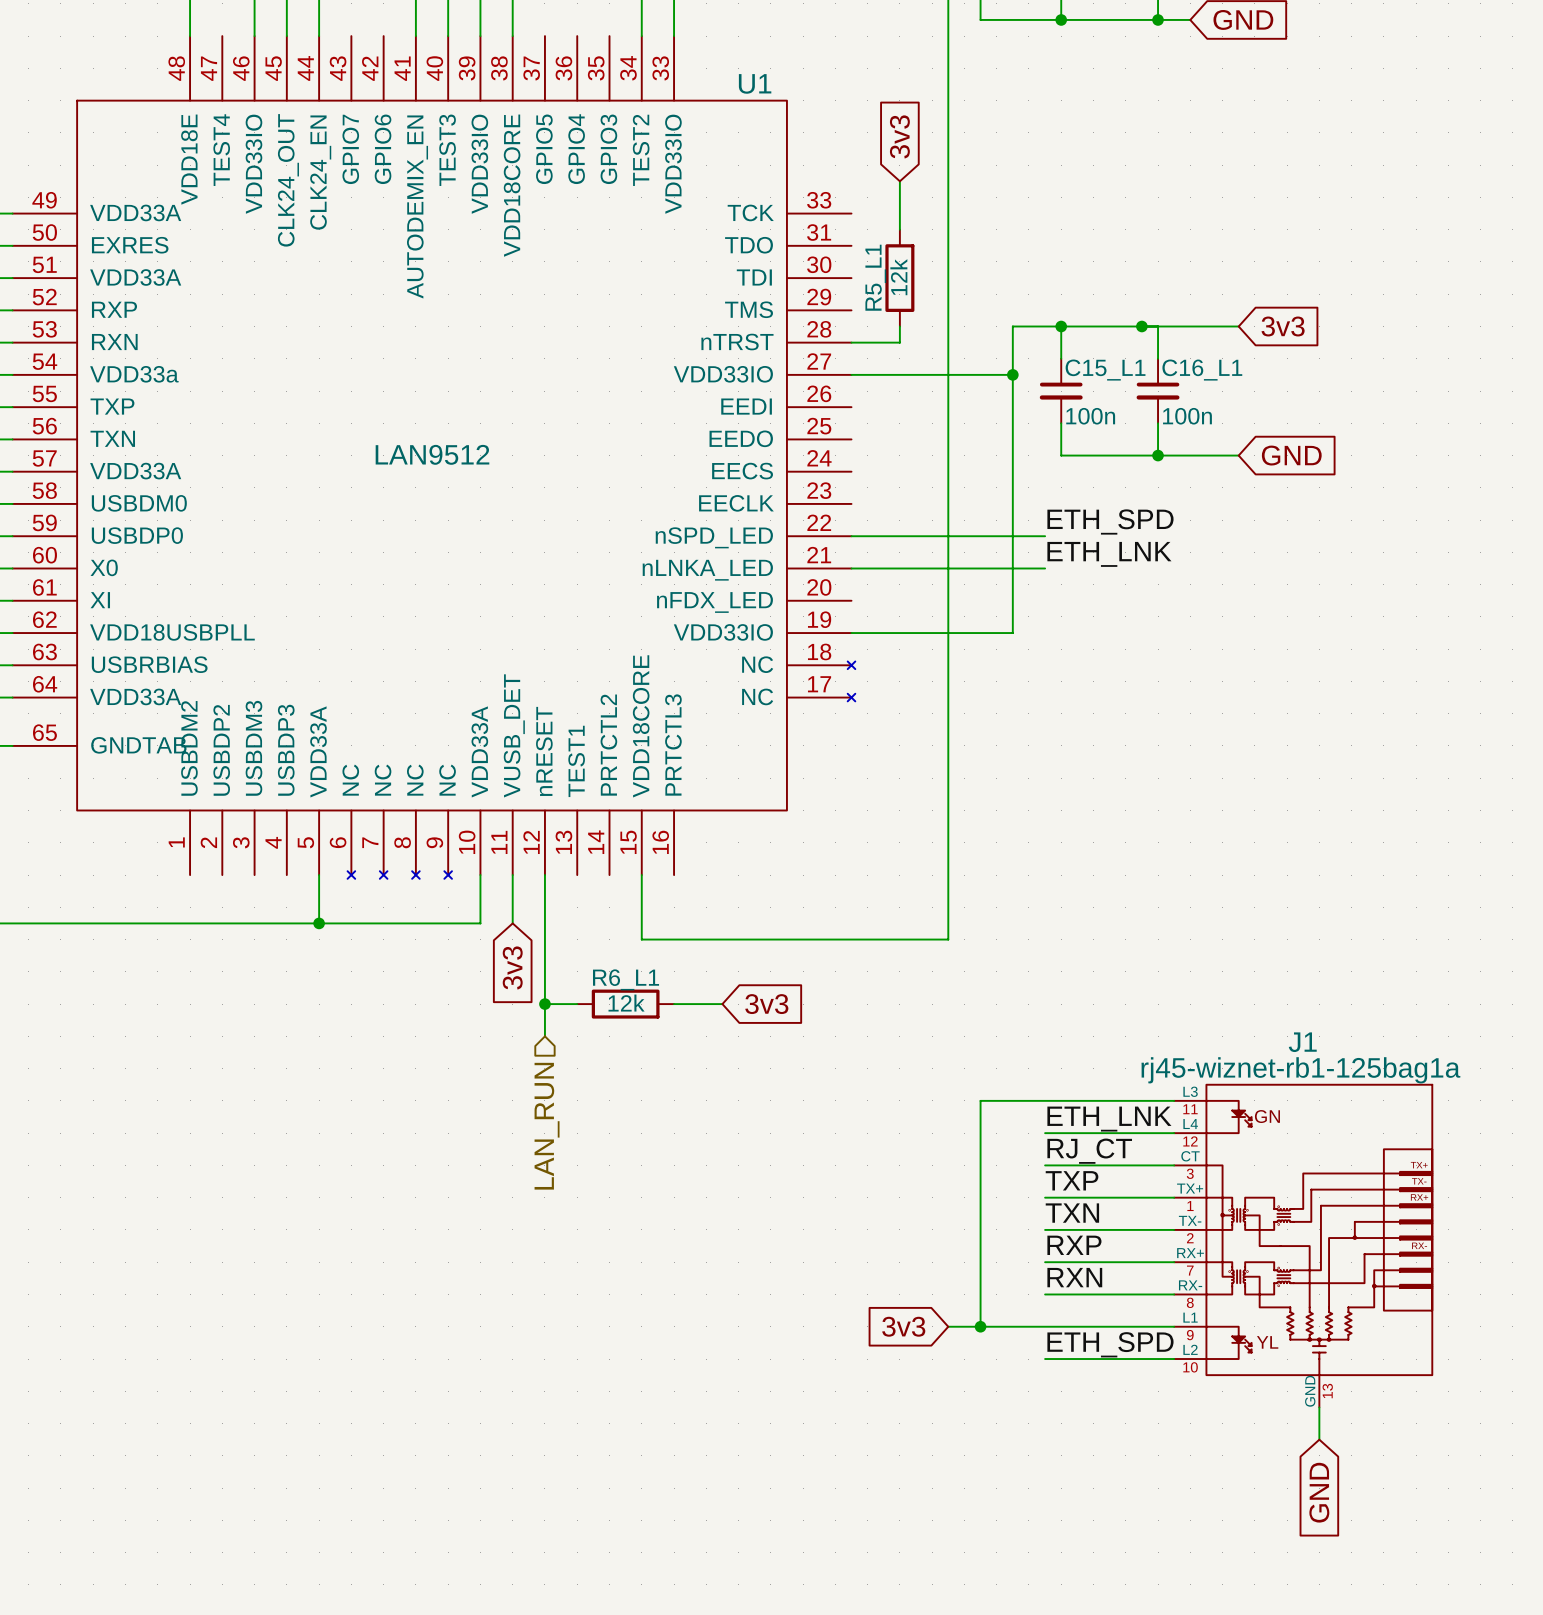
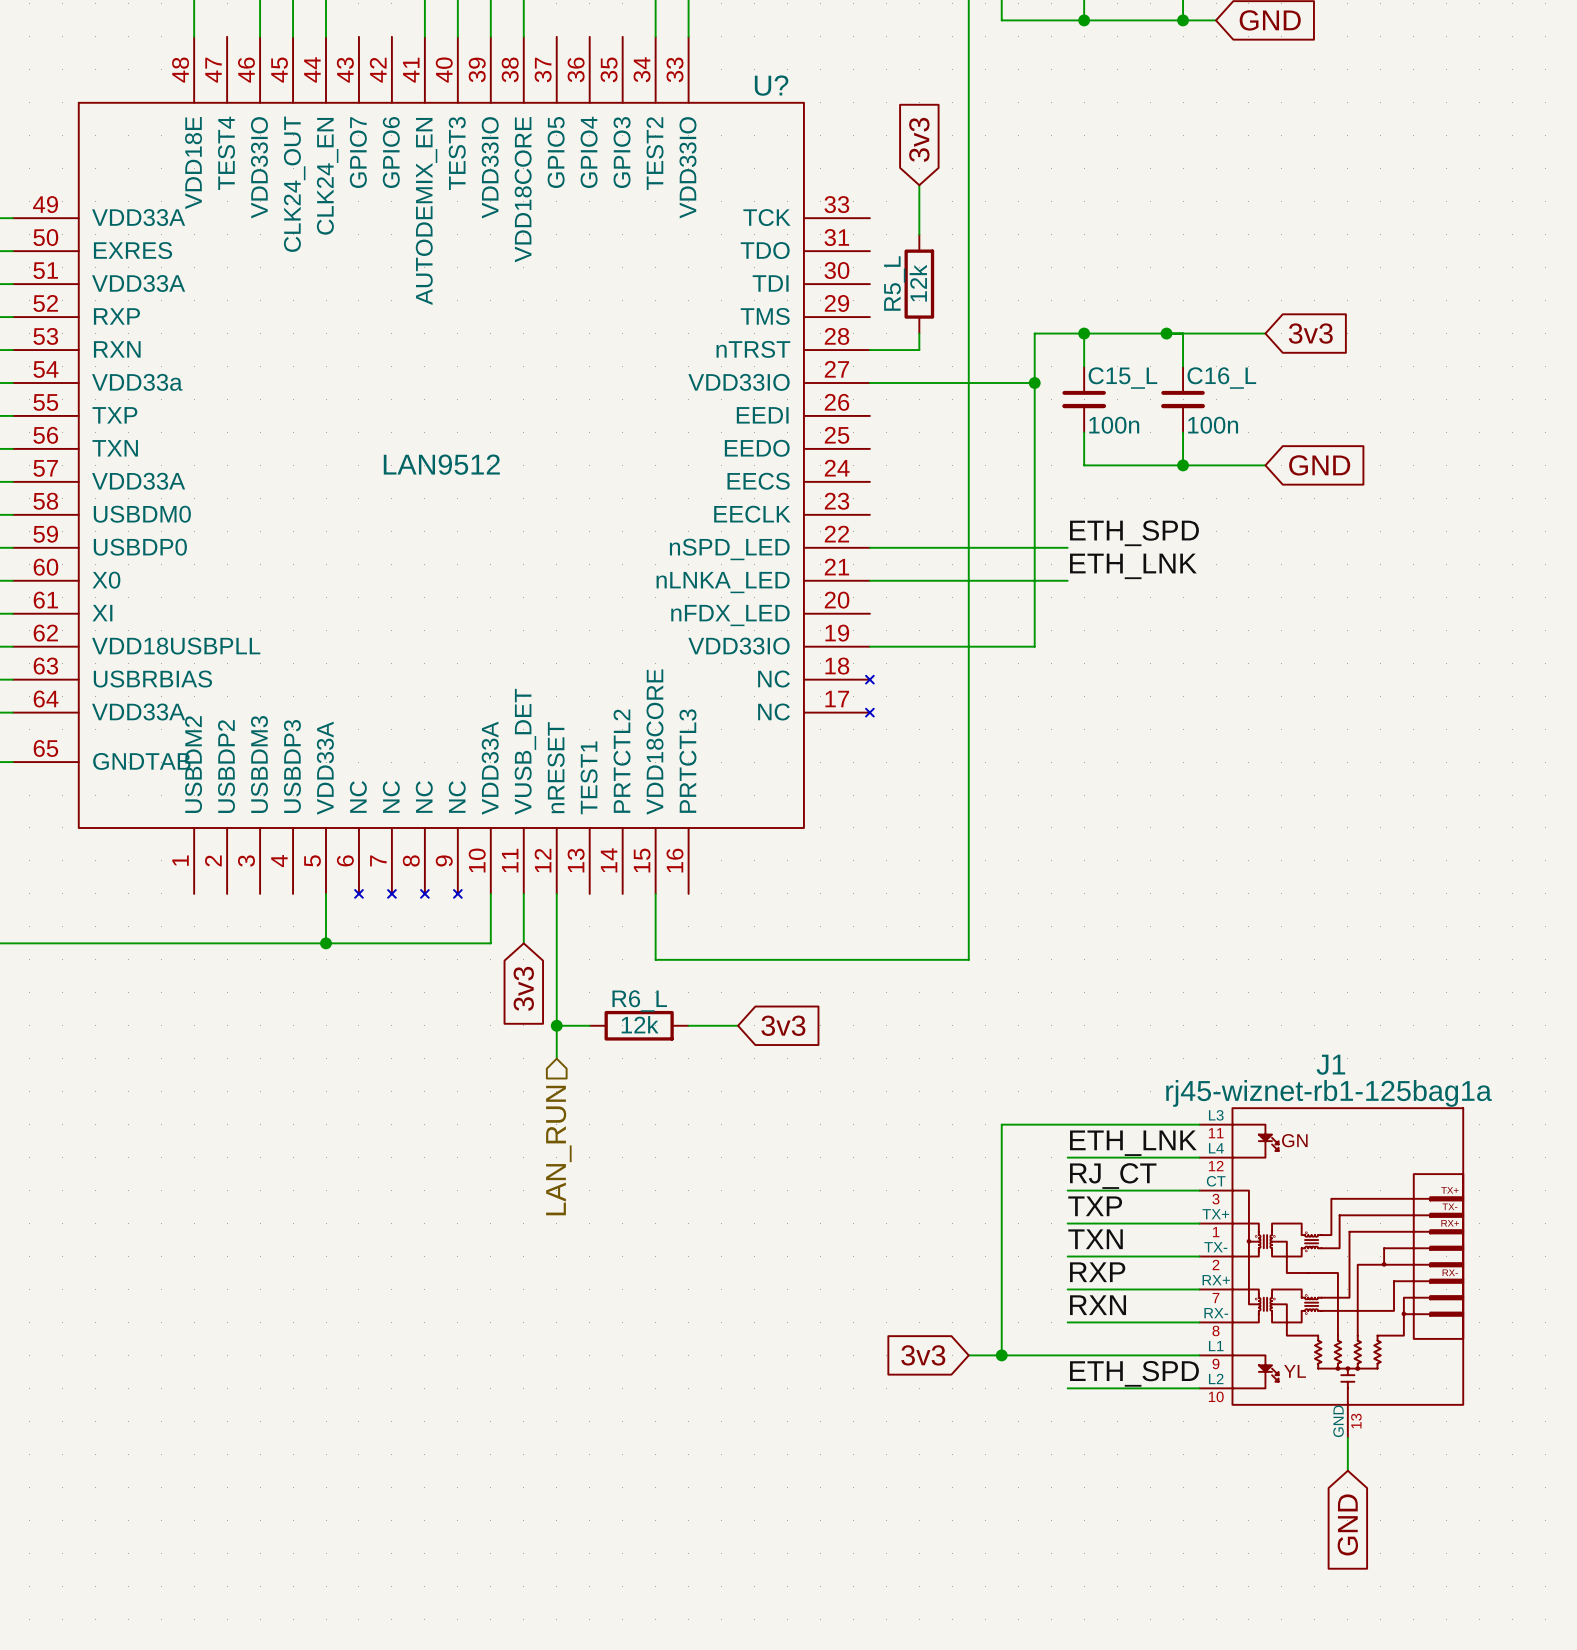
U1 name: U1 (755, 83) -> U? (771, 85)
R5_L1 name: R5_L1 (875, 277) -> R5_L (894, 283)
C15_L1 name: C15_L1 (1105, 370) -> C15_L (1122, 378)
C16_L1 name: C16_L1 (1202, 370) -> C16_L (1221, 378)
R6_L1 name: R6_L1 (626, 979) -> R6_L (639, 1001)

